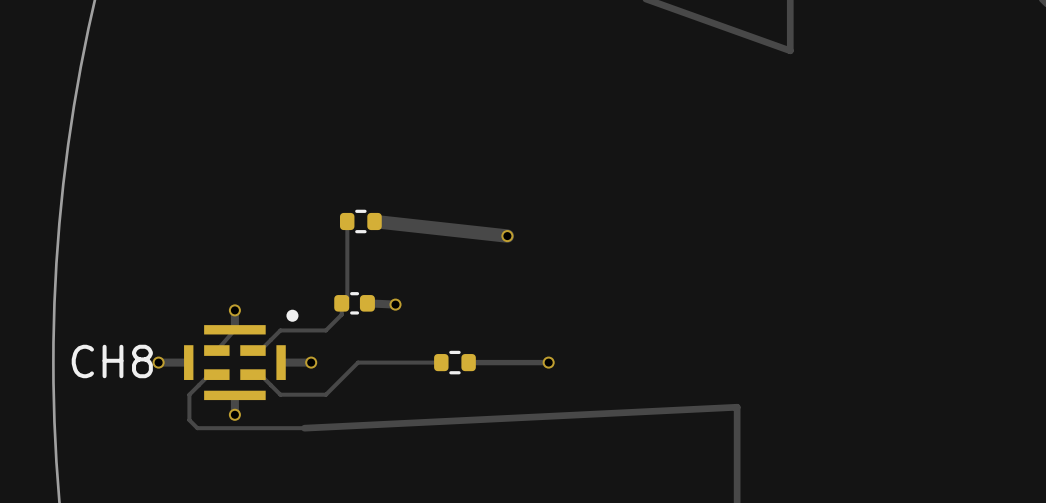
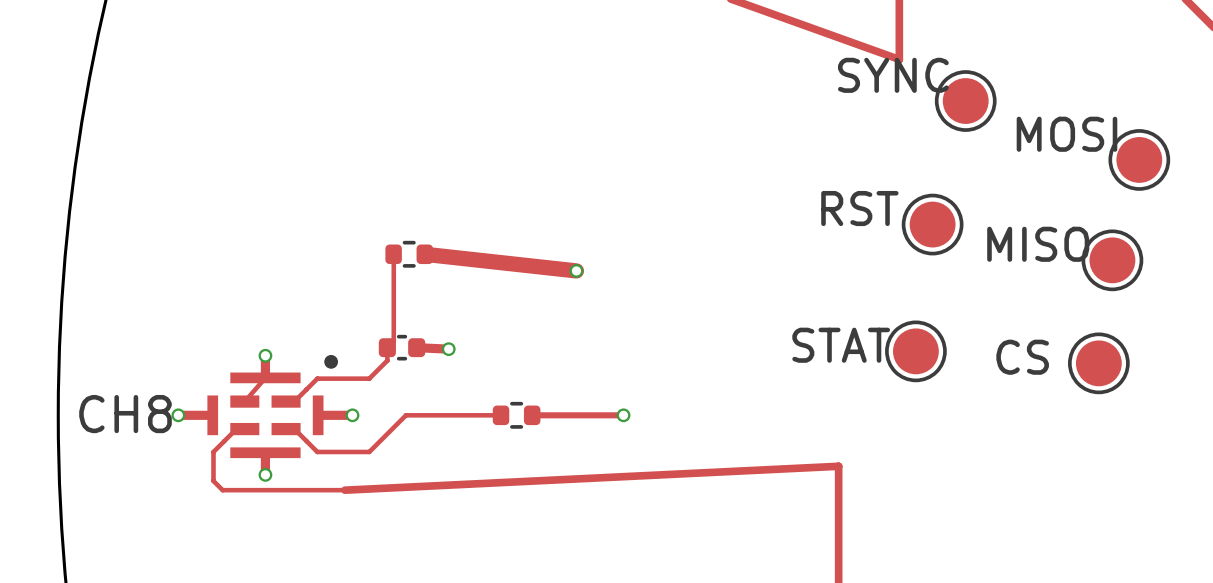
text: none -> SYNC (893, 75)
part: none -> (965, 101)
text: none -> MOSI (1066, 134)
part: none -> (1139, 159)
text: none -> RST (859, 208)
part: none -> (932, 224)
text: none -> MISO (1038, 244)
part: none -> (1112, 260)
text: none -> STAT (841, 345)
part: none -> (915, 351)
text: none -> CS (1022, 357)
part: none -> (1098, 363)

